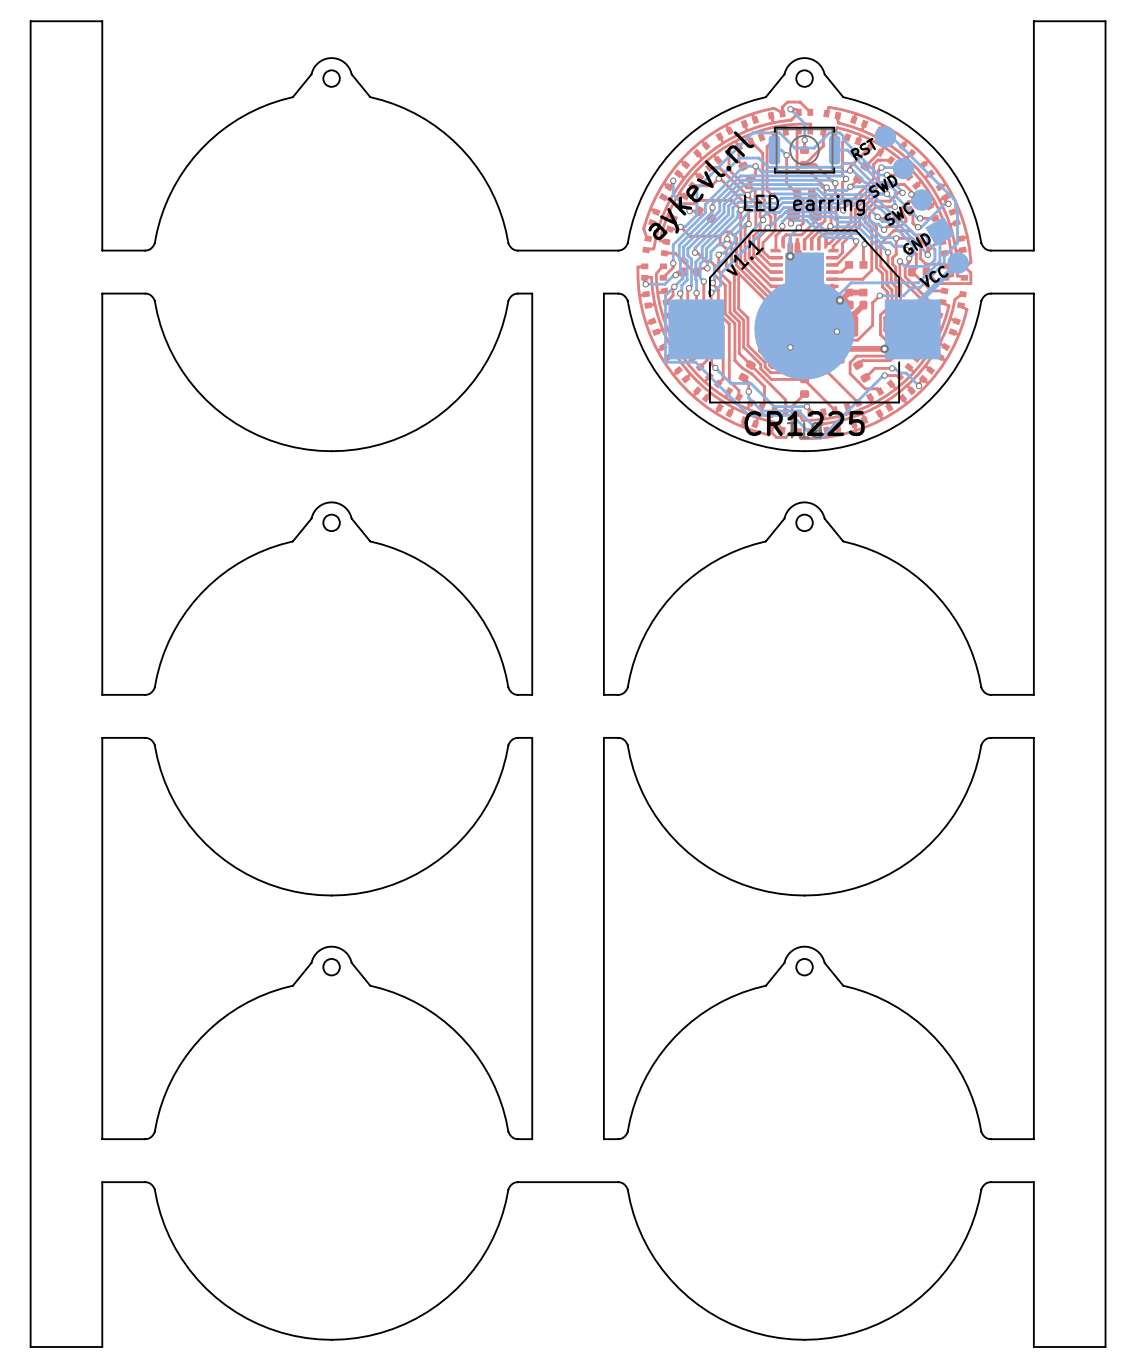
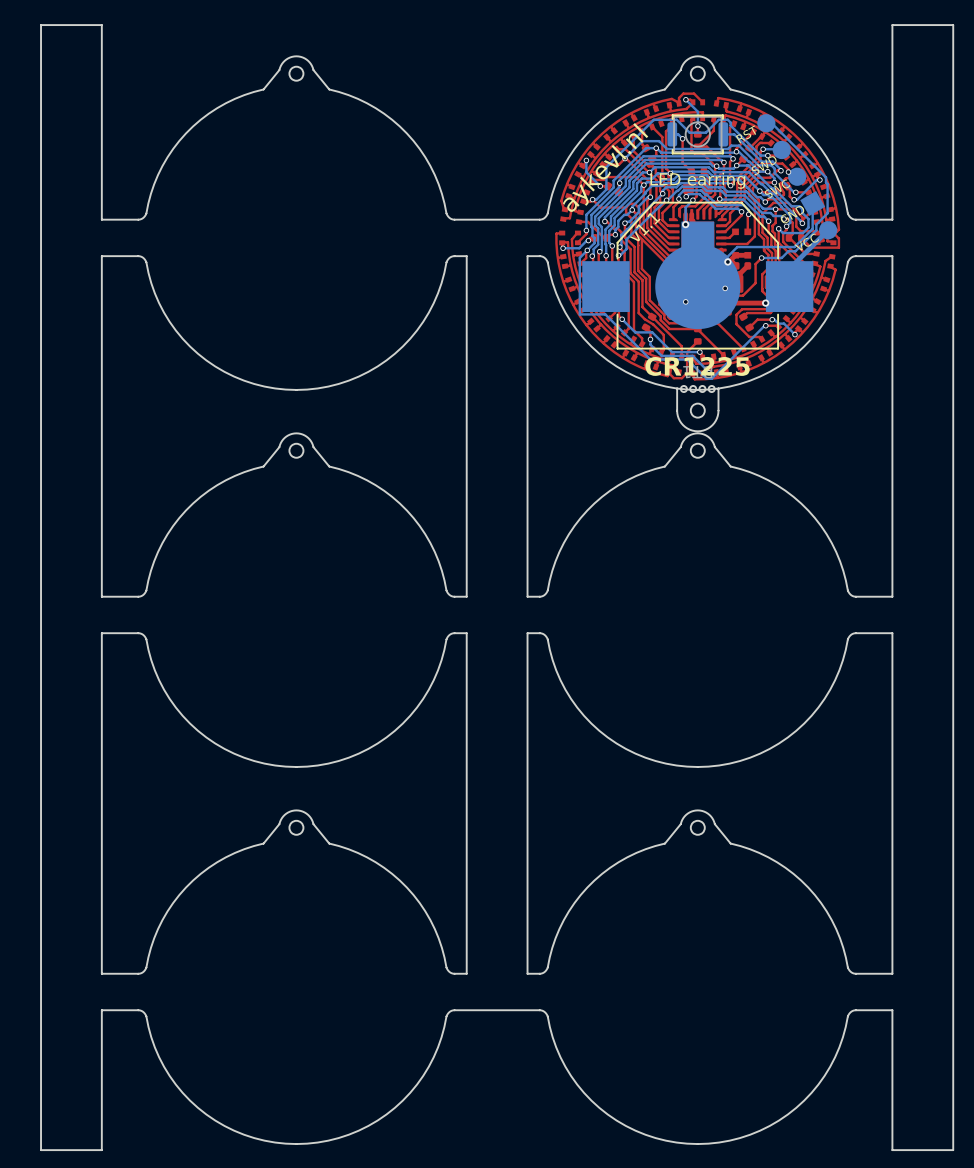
part: none -> (697, 408)

